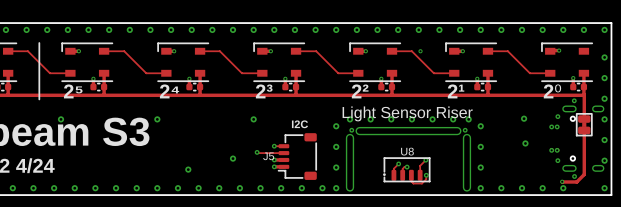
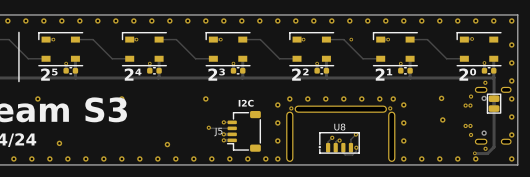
text: Light Sensor Riser (407, 113) -> none
via: (233, 158) -> none
via: (188, 169) -> none
via: none -> (59, 143)
via: none -> (167, 144)

